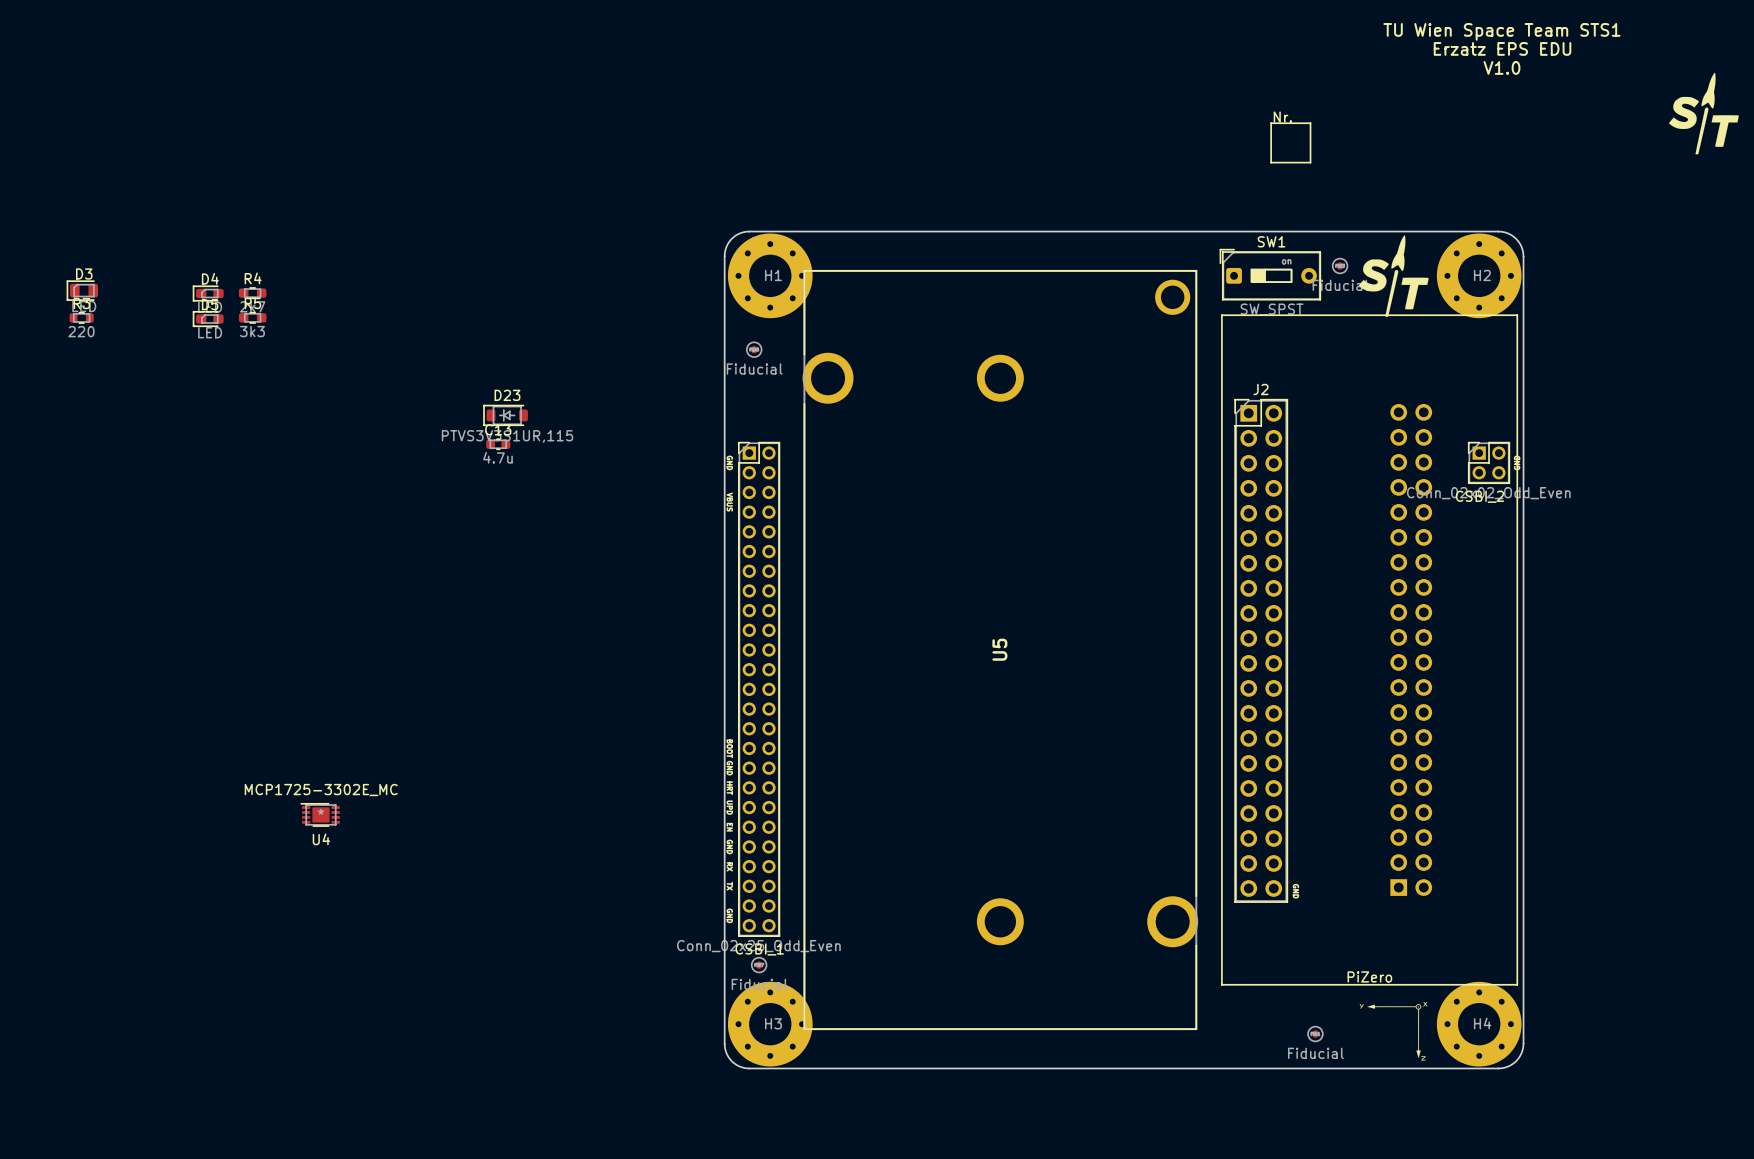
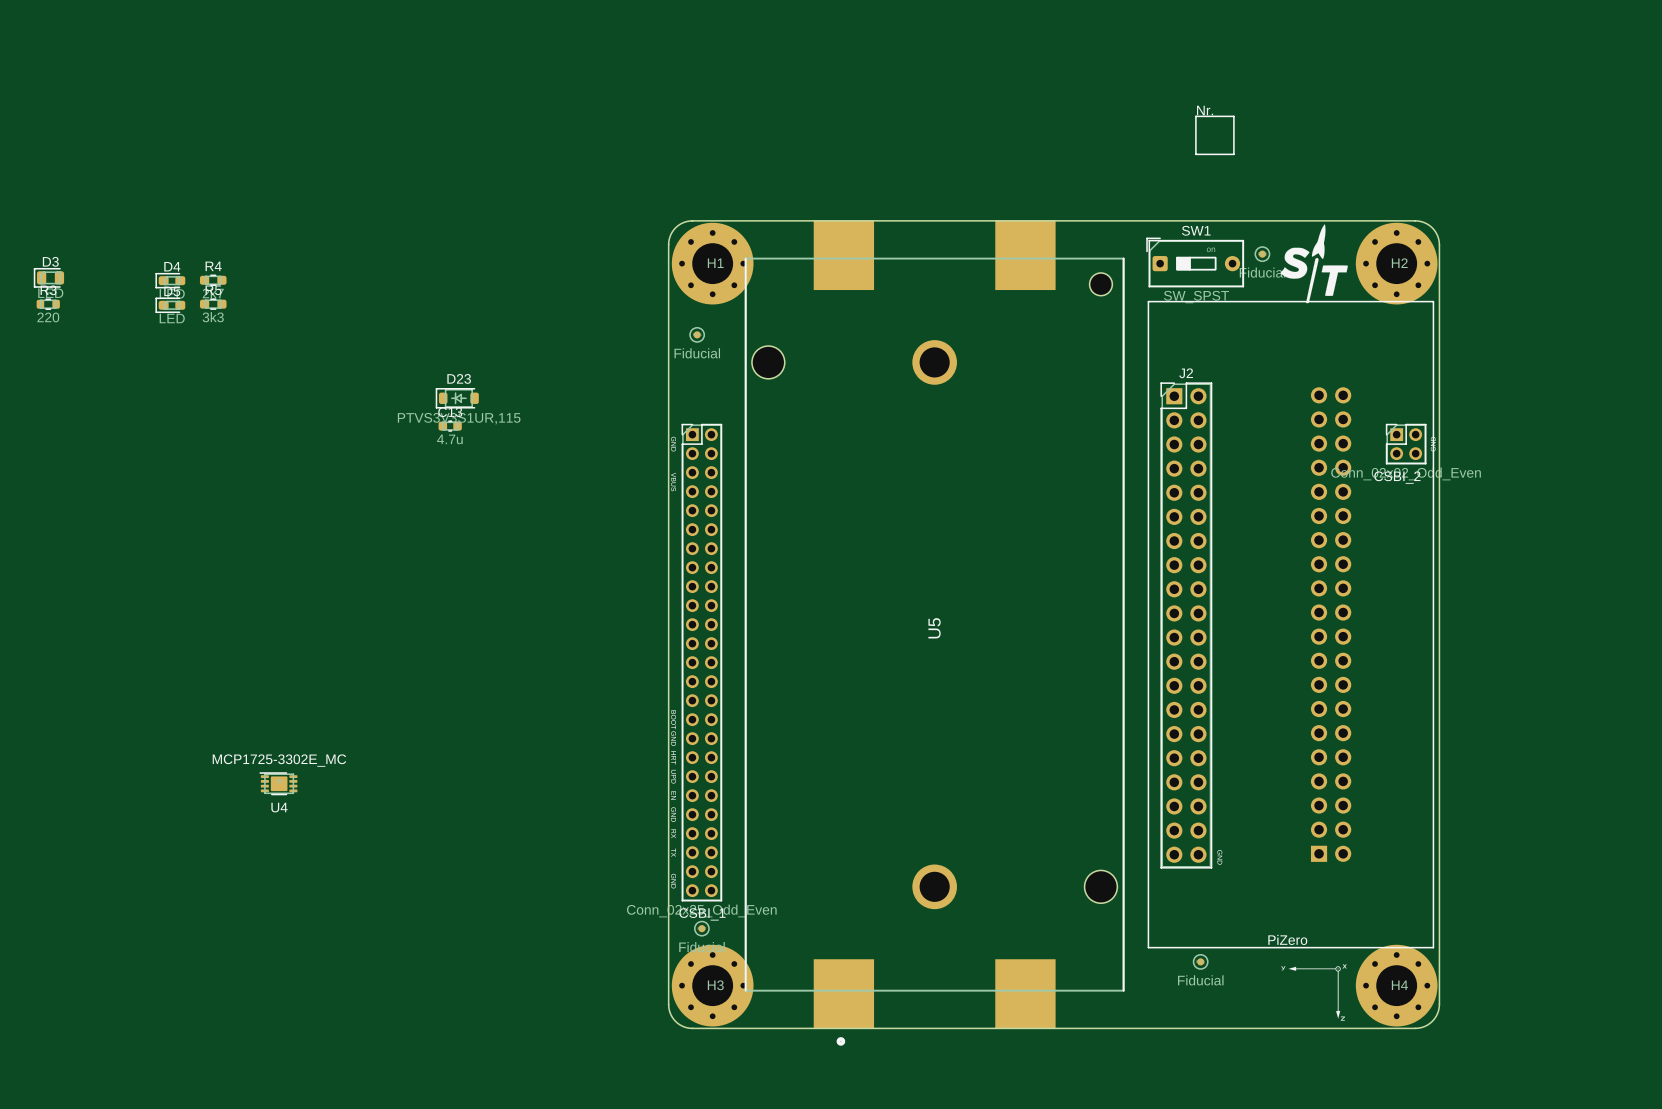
text: TU Wien Space Team STS1 (1501, 31) -> none
text: Erzatz EPS EDU (1502, 48) -> none
text: V1.0 (1501, 67) -> none
drawing: [1669, 72, 1739, 155] -> none
U5 footprint: [802, 269, 1199, 1031] -> [744, 220, 1125, 1046]
part position: (1315, 1034) -> (1200, 961)

